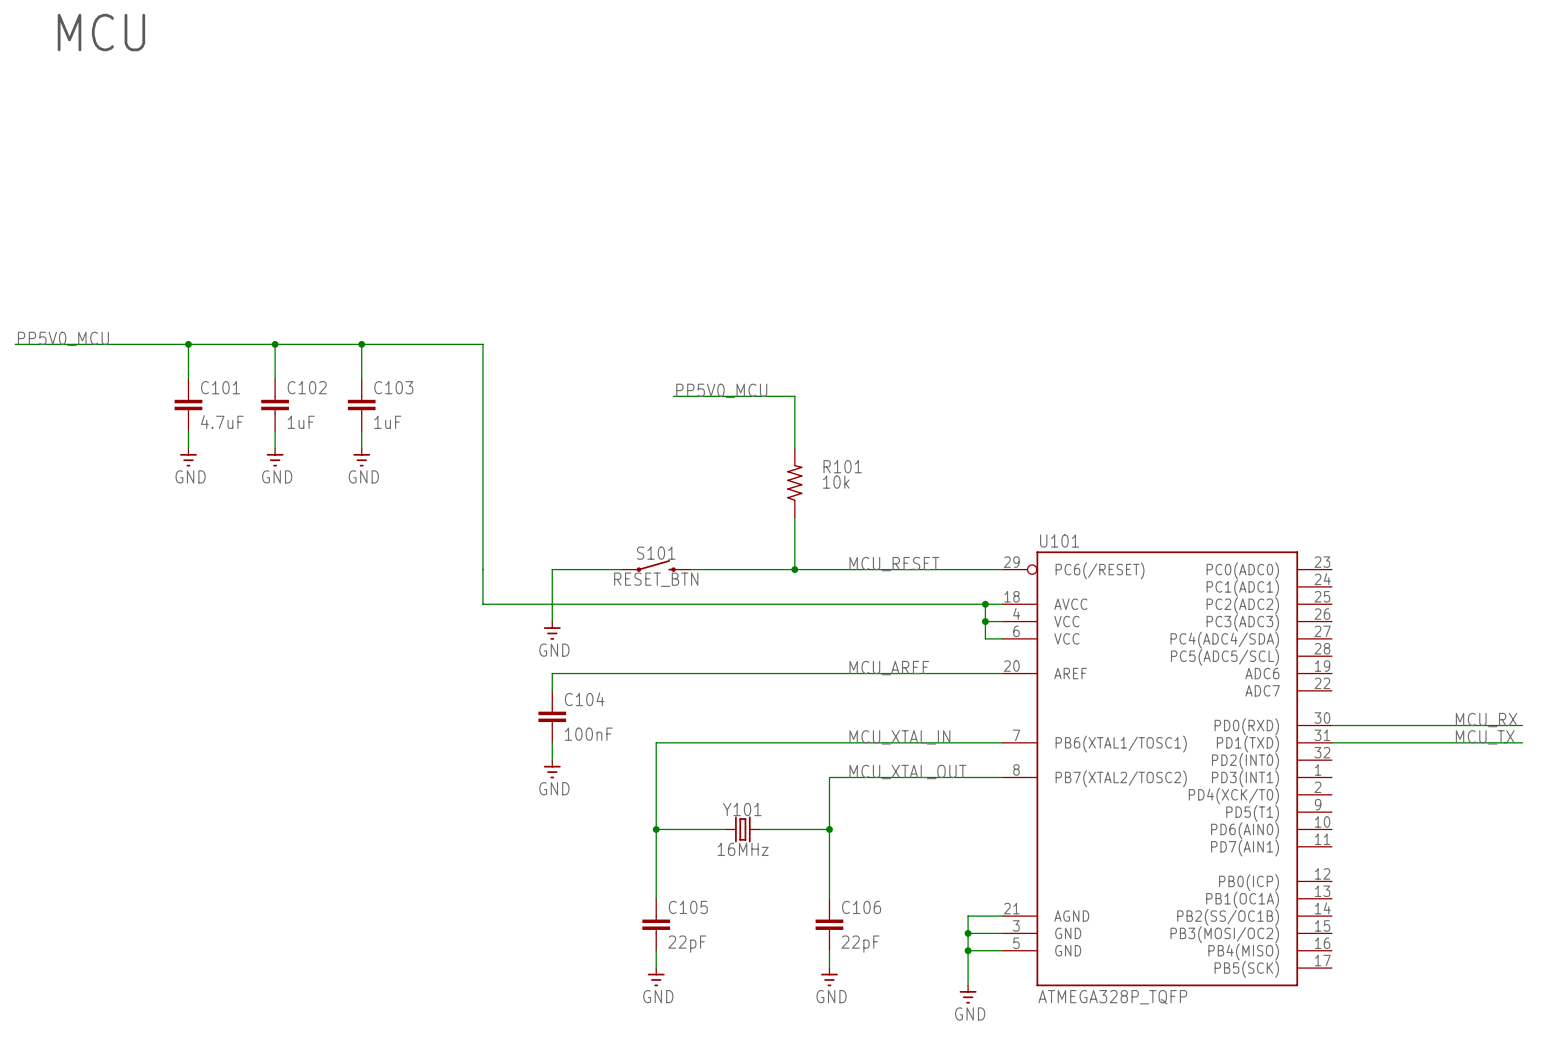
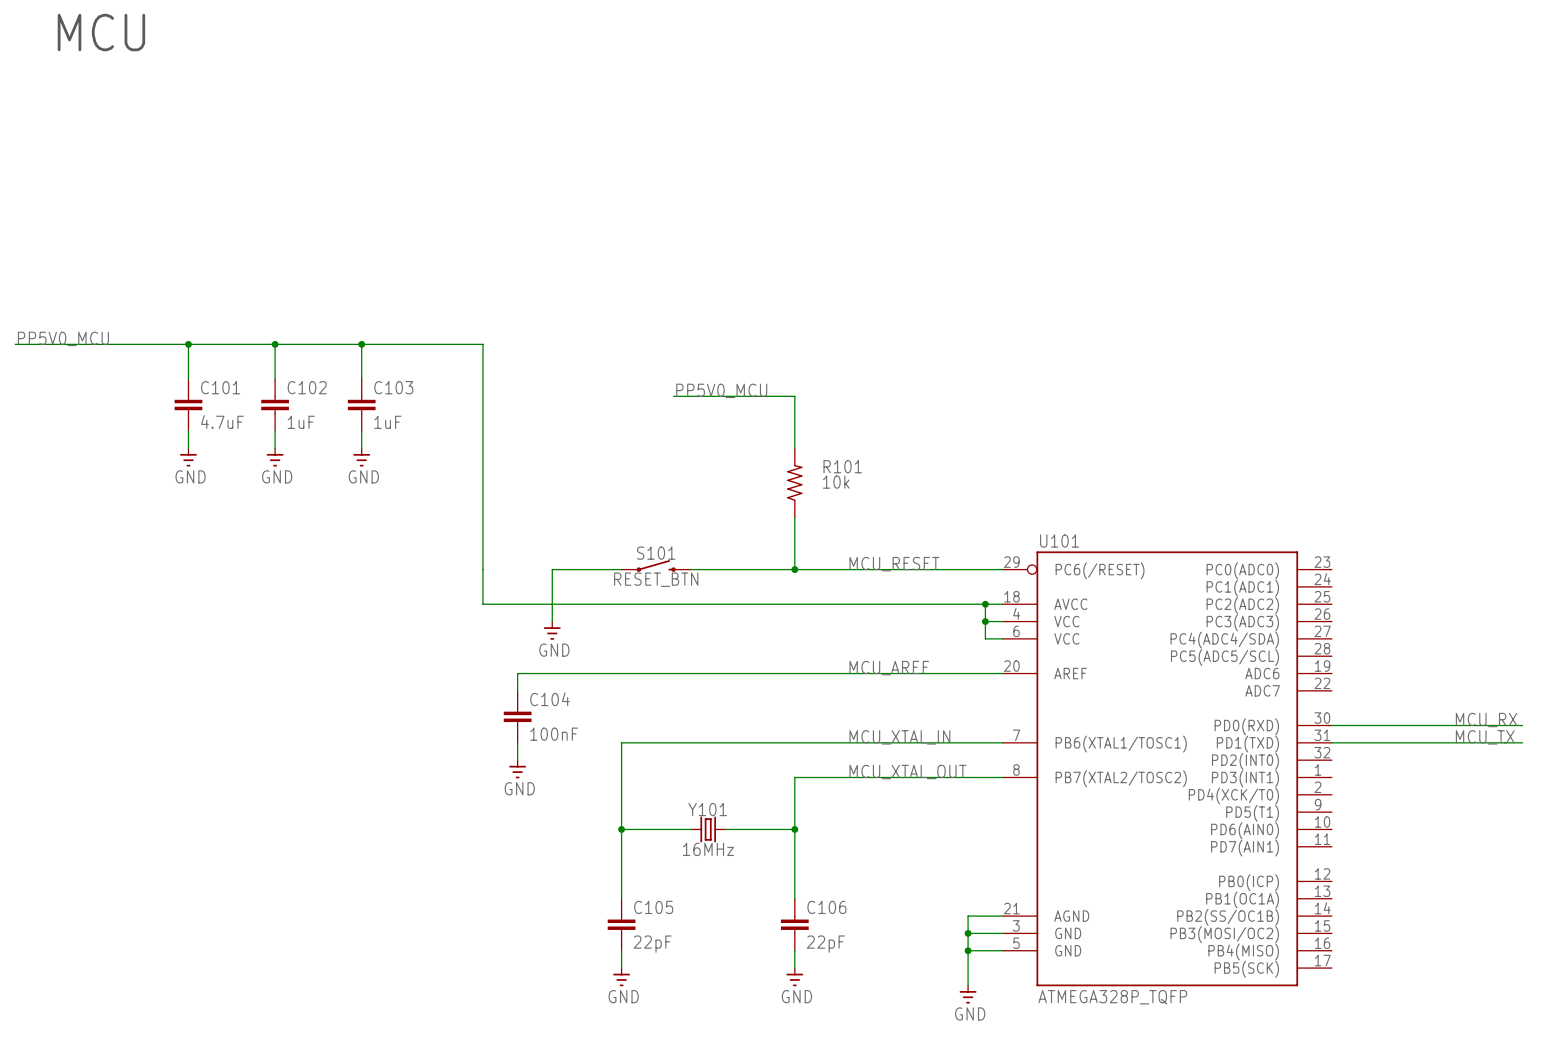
wire: (552, 673) (552, 690) -> (552, 673) (517, 673) (517, 690)
C104 position: (552, 716) -> (517, 716)
wire: (552, 742) (552, 760) -> (517, 742) (517, 760)
wire: (656, 742) (656, 898) -> (656, 742) (621, 742) (621, 898)
power symbol position: GND (552, 769) -> GND (517, 769)
wire: (829, 777) (829, 898) -> (829, 777) (794, 777) (794, 898)
wire: none -> (621, 829) (656, 829)
junction position: (656, 829) -> (621, 829)
Y101 position: (742, 829) -> (708, 829)
wire: (794, 829) (829, 829) -> none
junction position: (829, 829) -> (794, 829)
C105 position: (656, 924) -> (621, 924)
C106 position: (829, 924) -> (794, 924)
wire: (656, 950) (656, 968) -> (621, 950) (621, 968)
wire: (829, 950) (829, 968) -> (794, 950) (794, 968)
power symbol position: GND (656, 976) -> GND (621, 976)
power symbol position: GND (829, 976) -> GND (794, 976)

